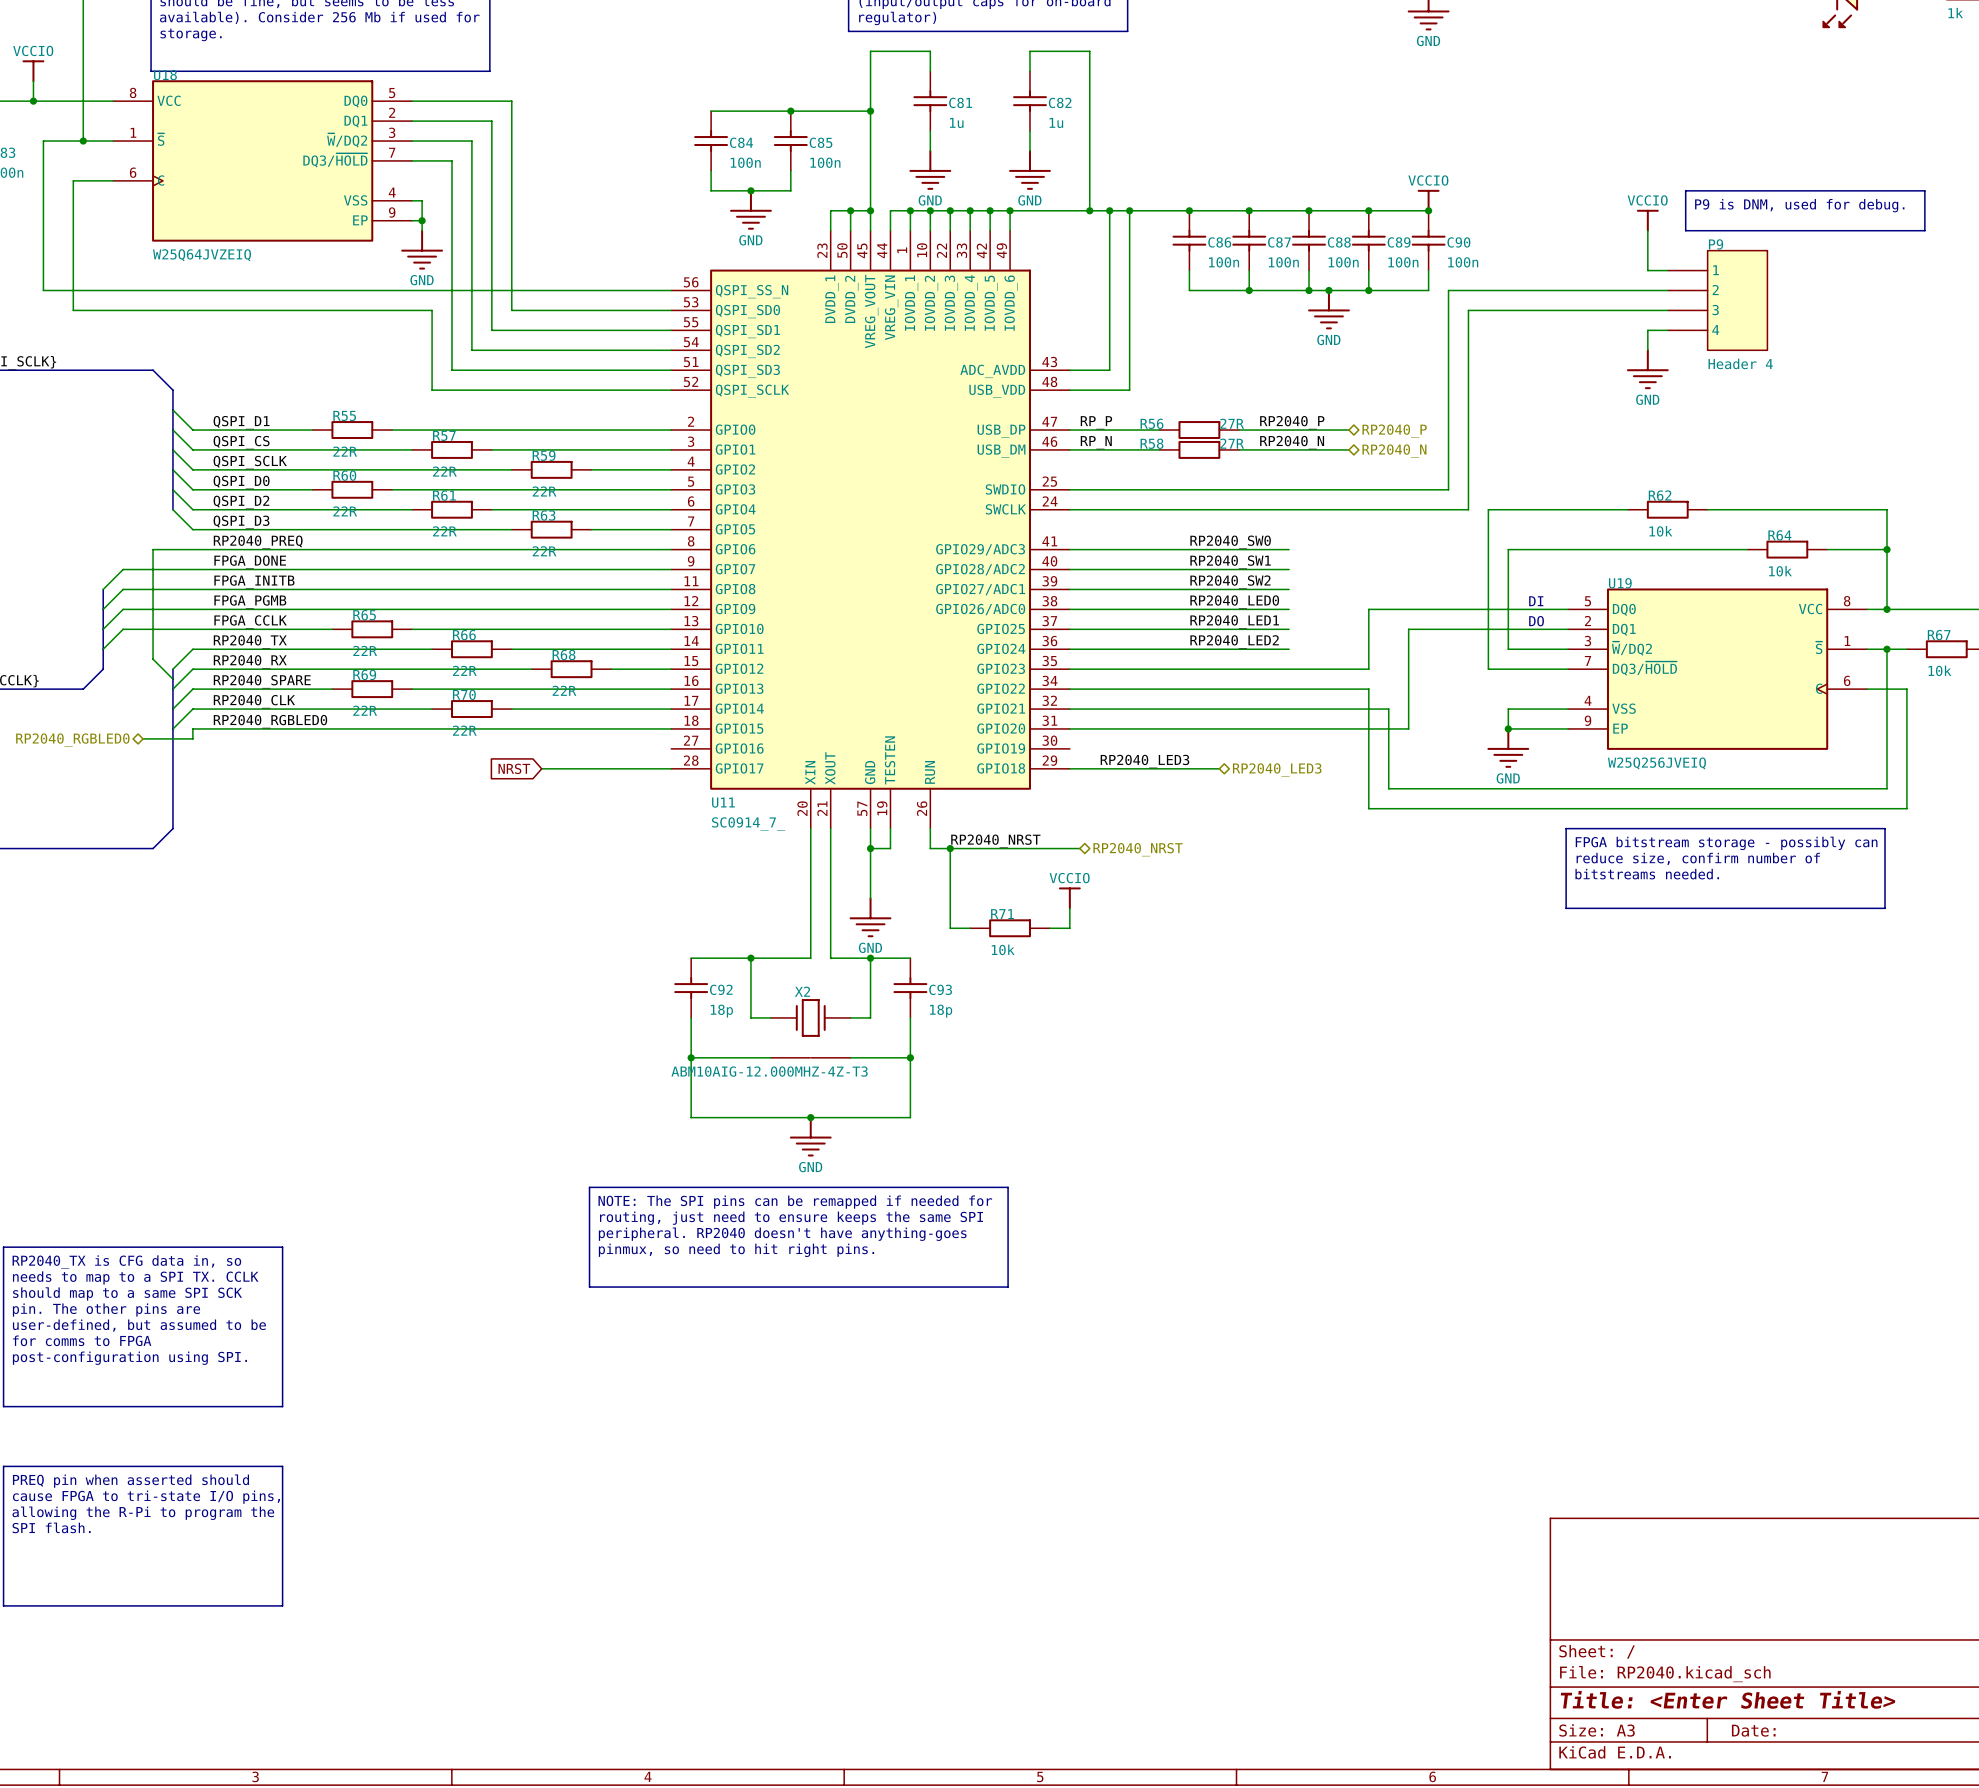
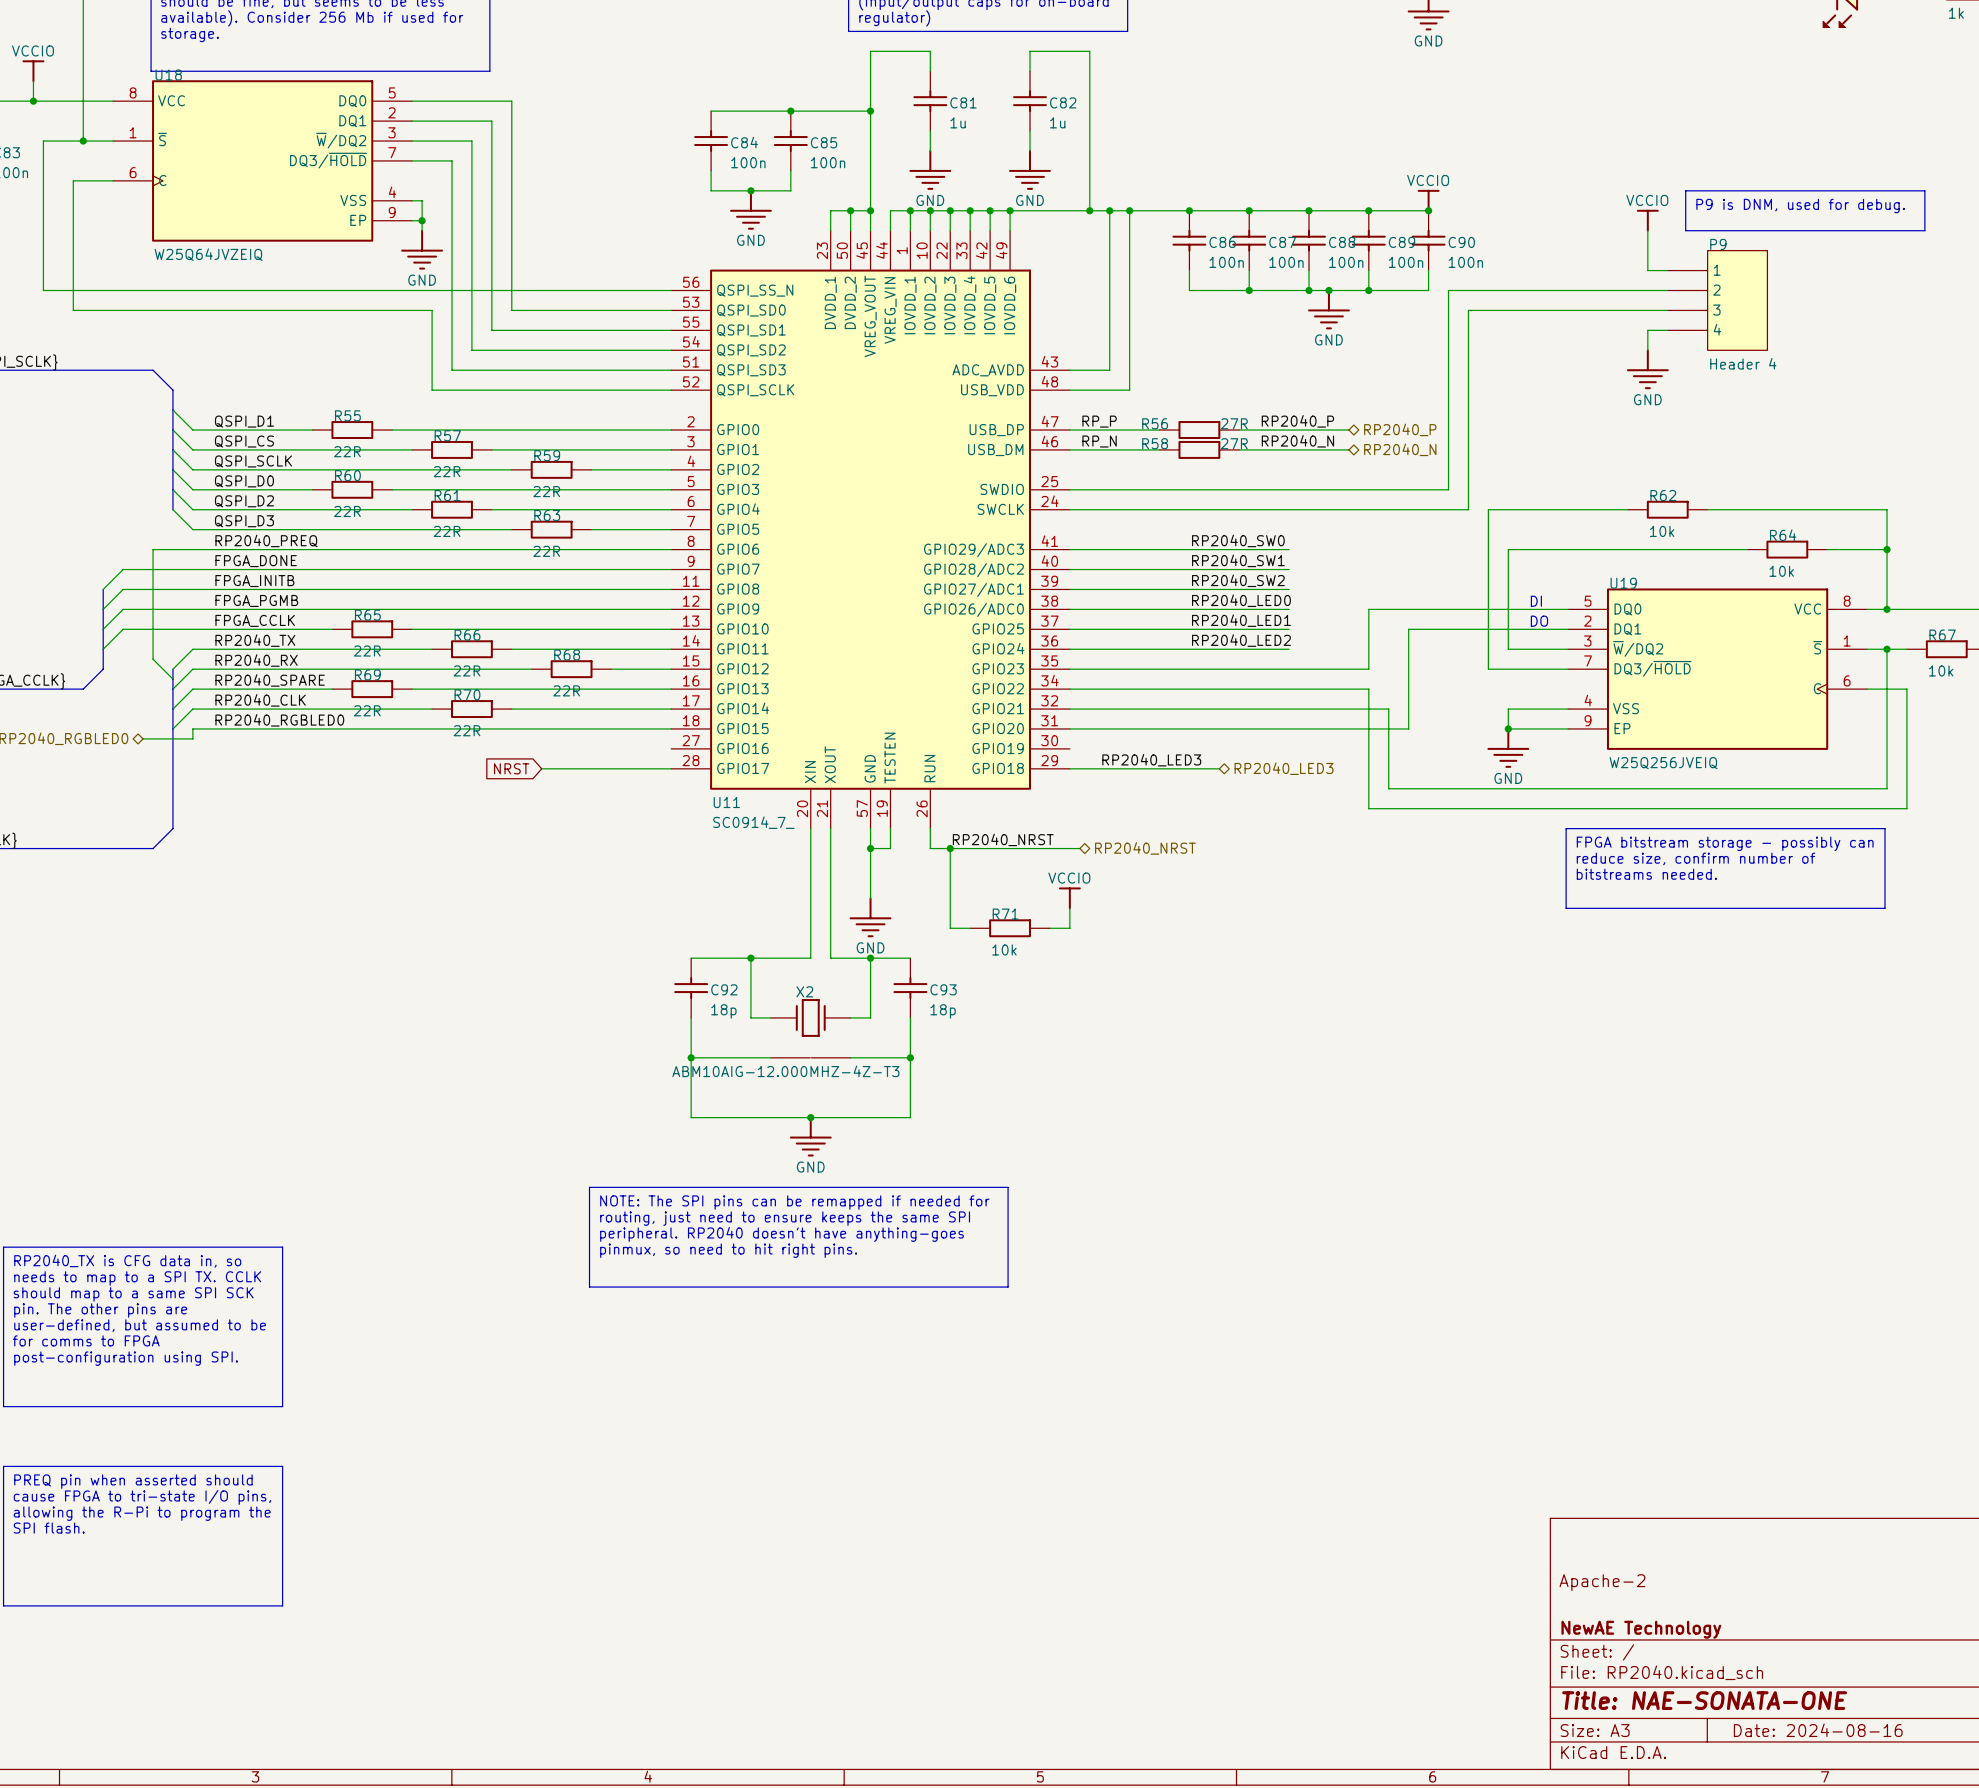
title block: none -> Apache-2 (1602, 1582)
title block: none -> NewAE Technology (1641, 1629)
title block: Title: <Enter Sheet Title> (1728, 1699) -> Title: NAE-SONATA-ONE (1704, 1700)
title block: Date: (1753, 1730) -> Date: 2024-08-16 (1818, 1730)

